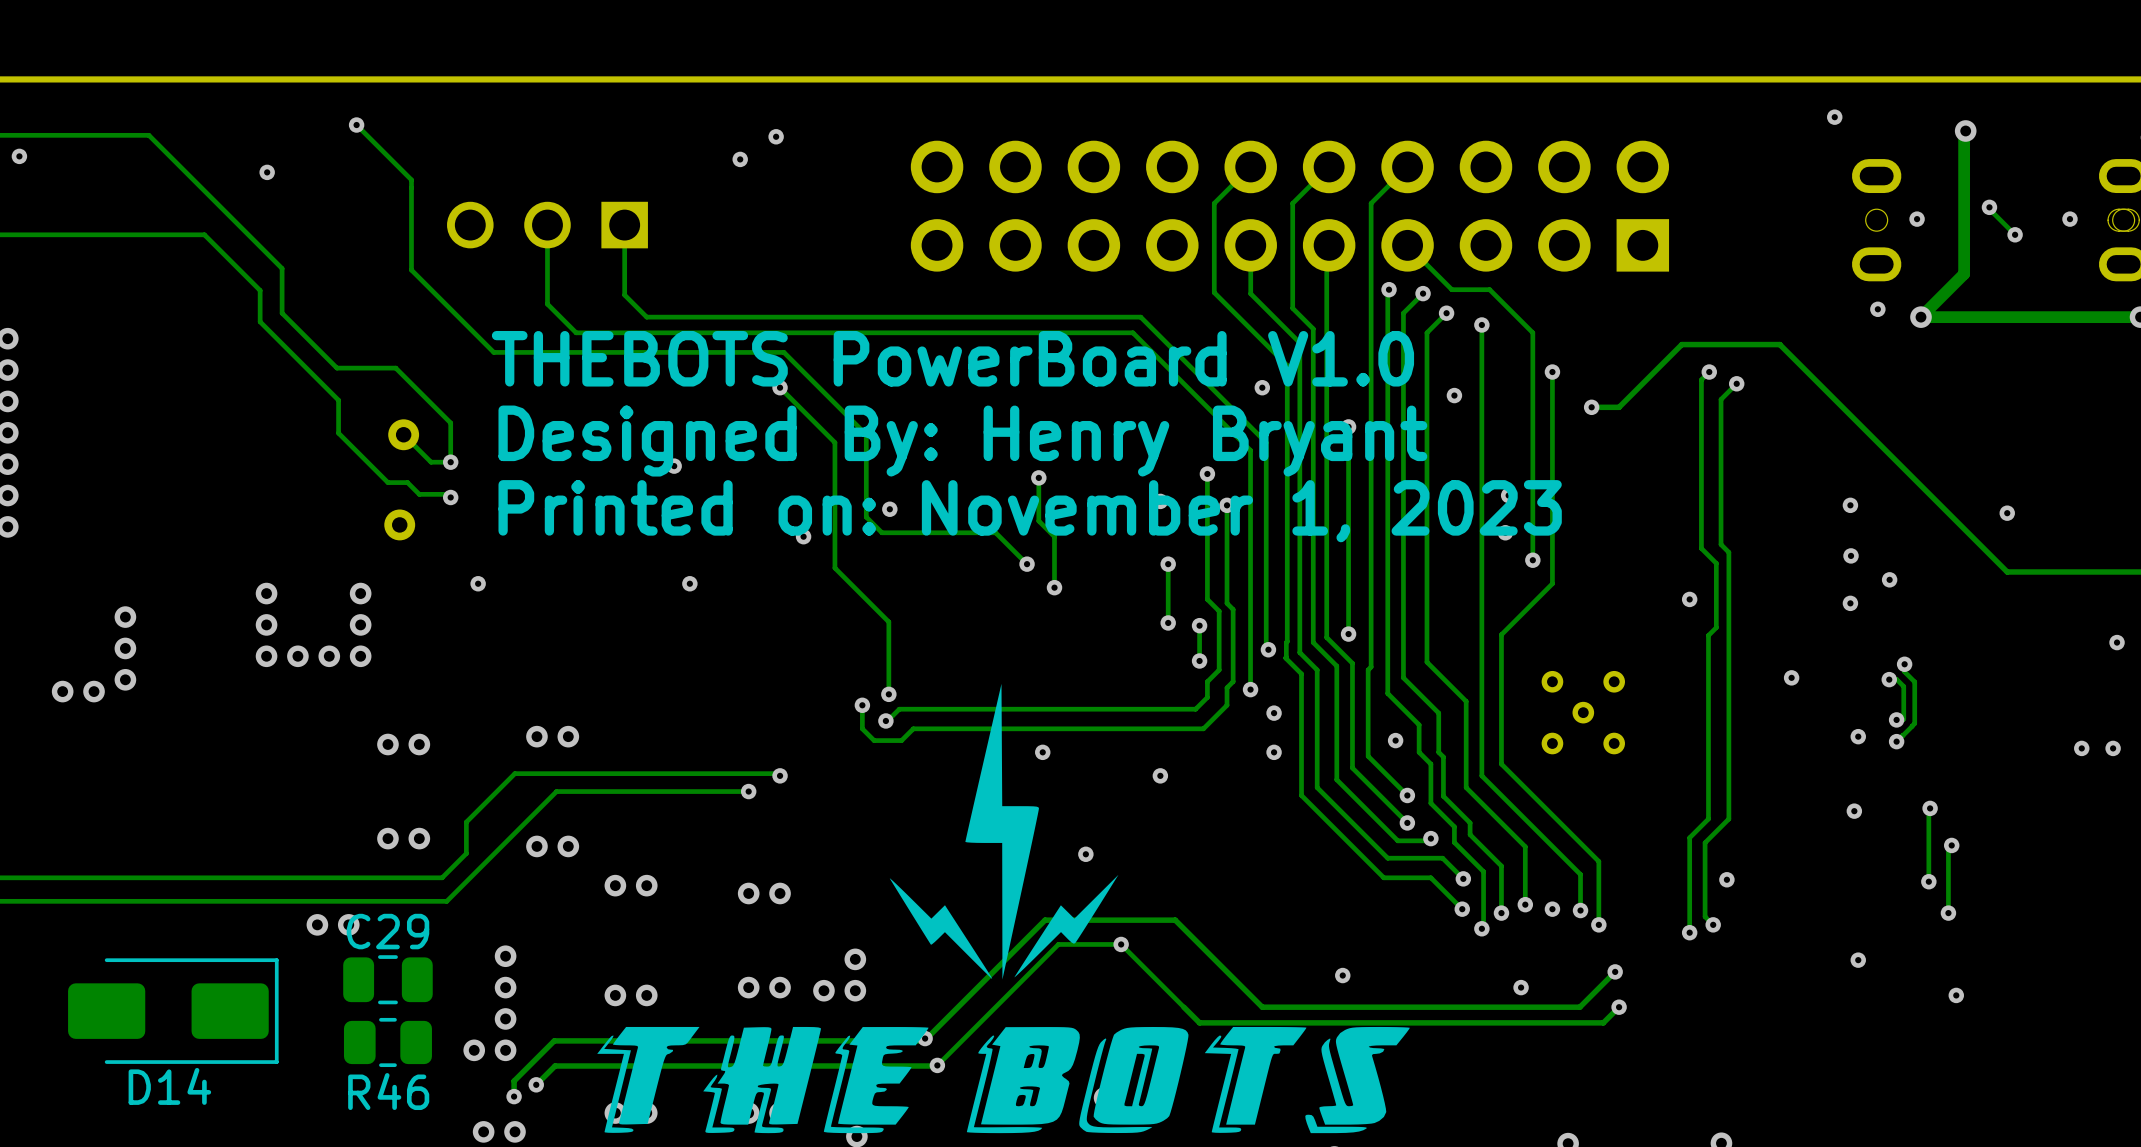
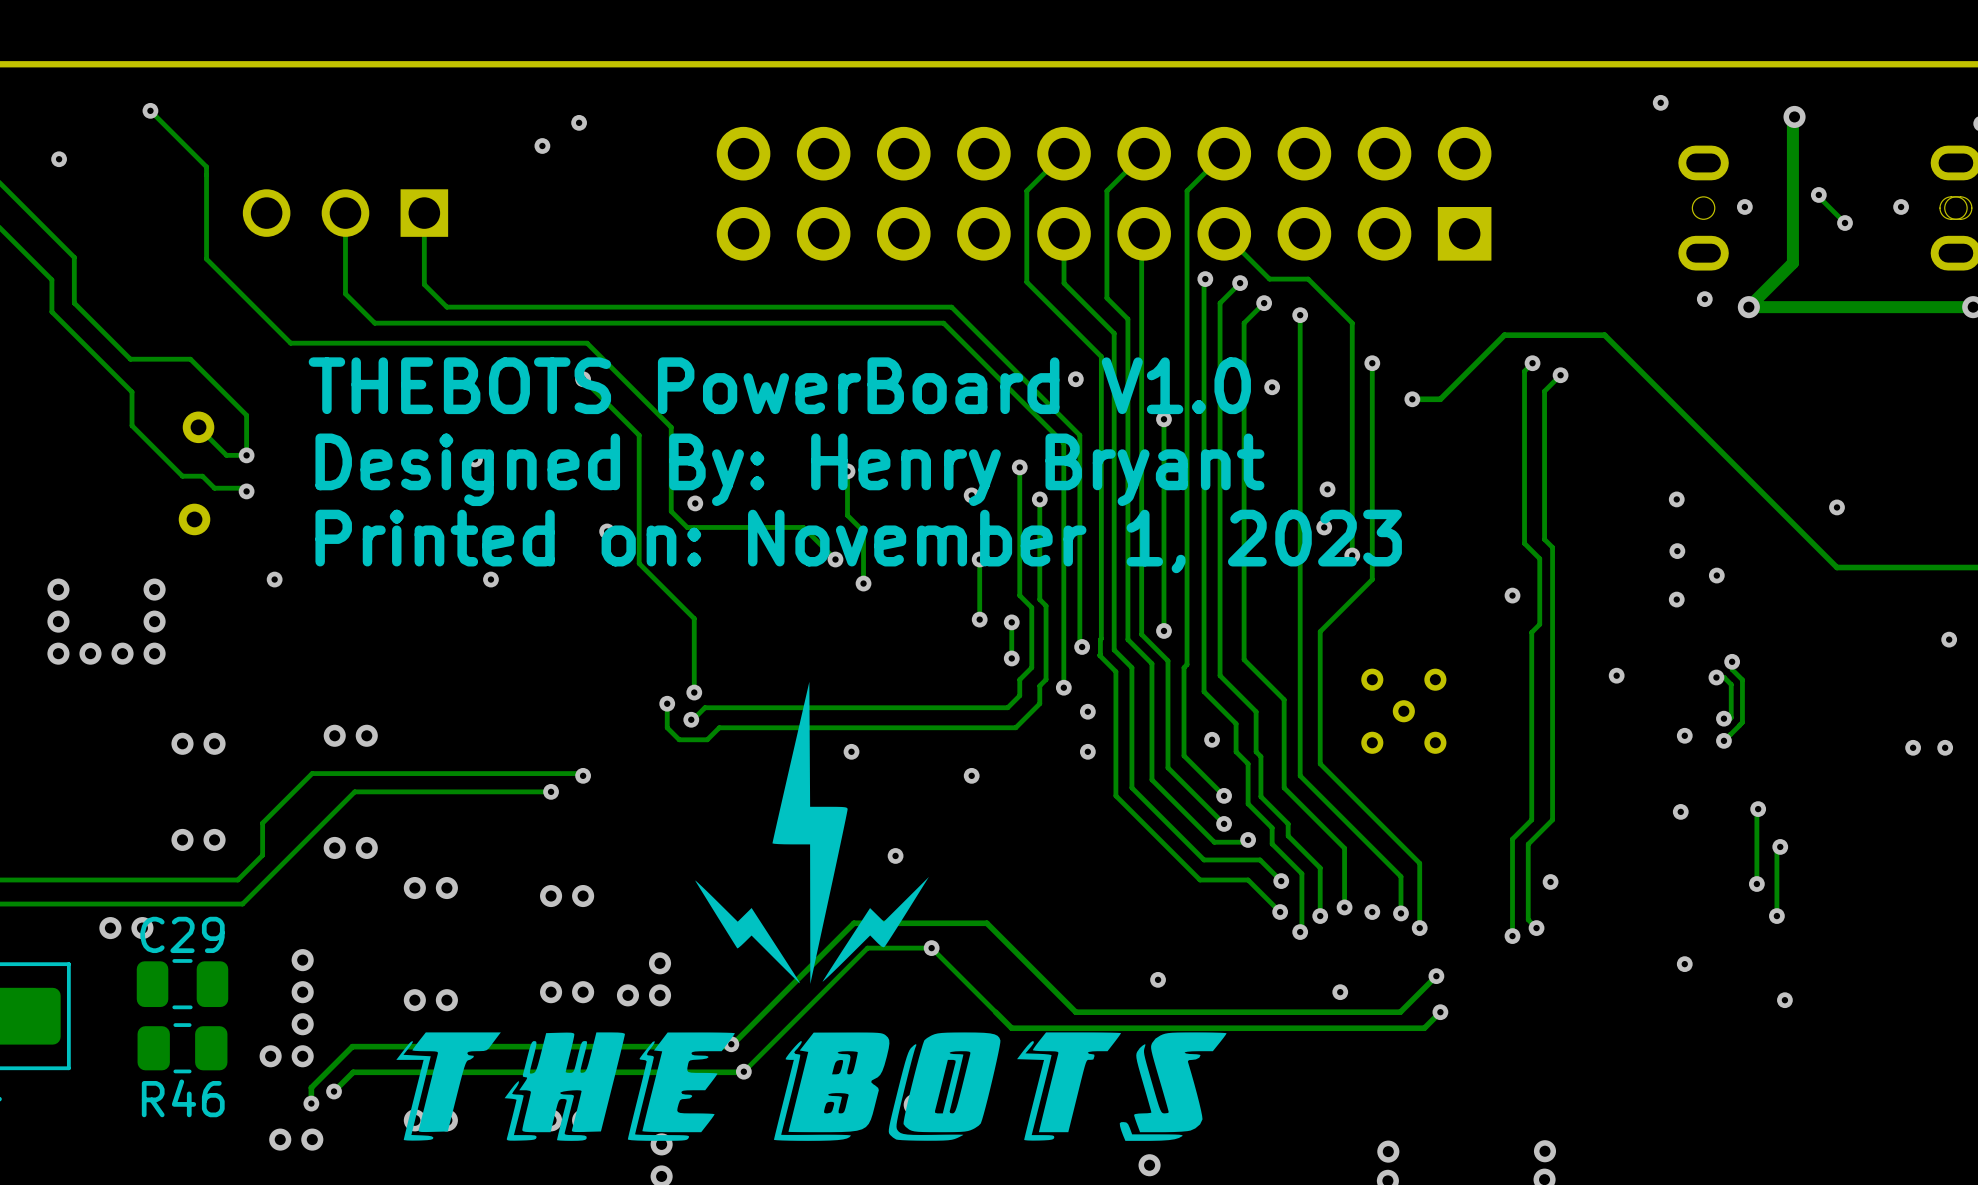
text position: THEBOTS PowerBoard V1.0 (952, 358) -> THEBOTS PowerBoard V1.0 (779, 385)
text position: Designed By: Henry Bryant (962, 441) -> Designed By: Henry Bryant (789, 469)
text position: Printed on: November 1, 2023 (1030, 511) -> Printed on: November 1, 2023 (858, 541)

